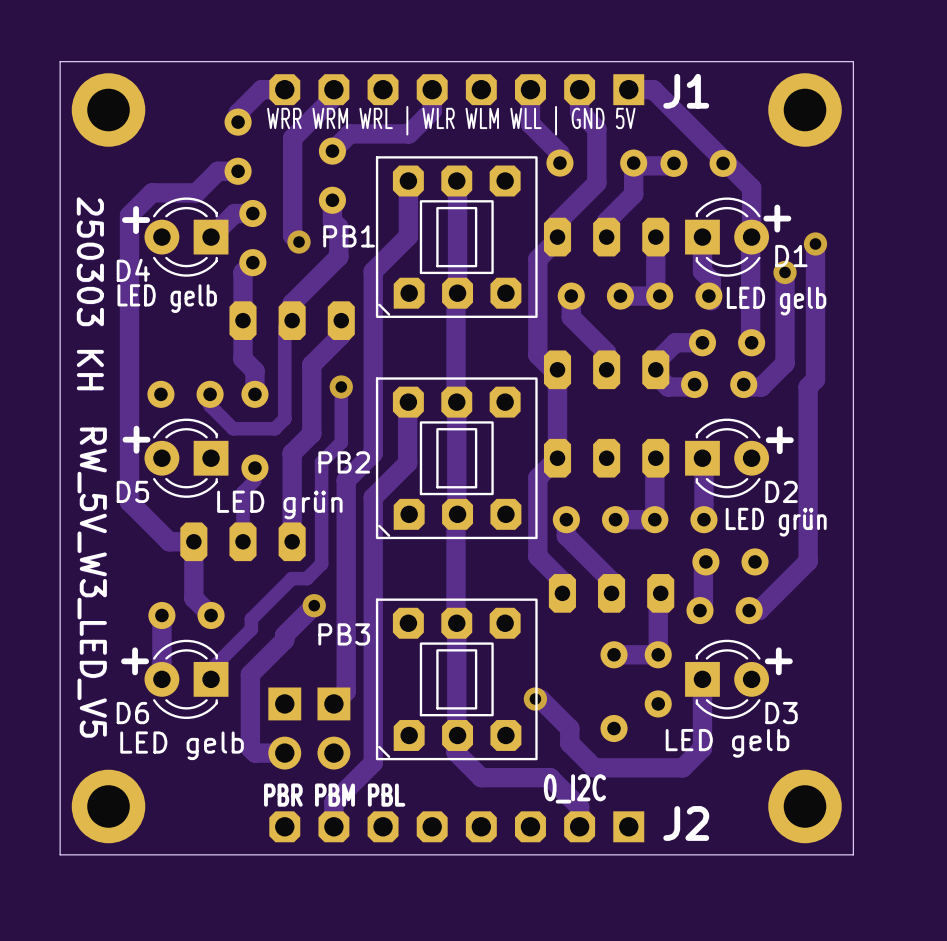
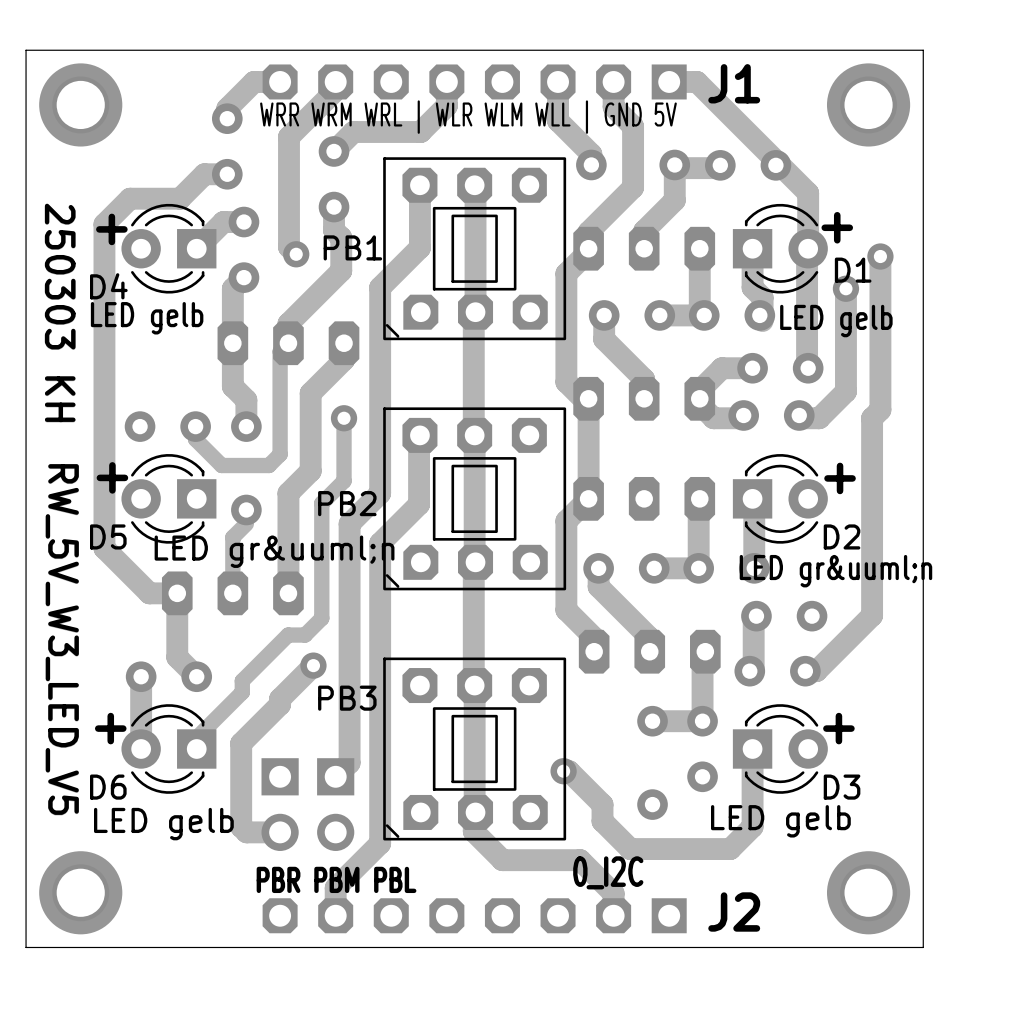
text: LED grün (279, 504) -> LED gr&uuml;n (274, 551)
text: LED grün (776, 522) -> LED gr&uuml;n (835, 571)

